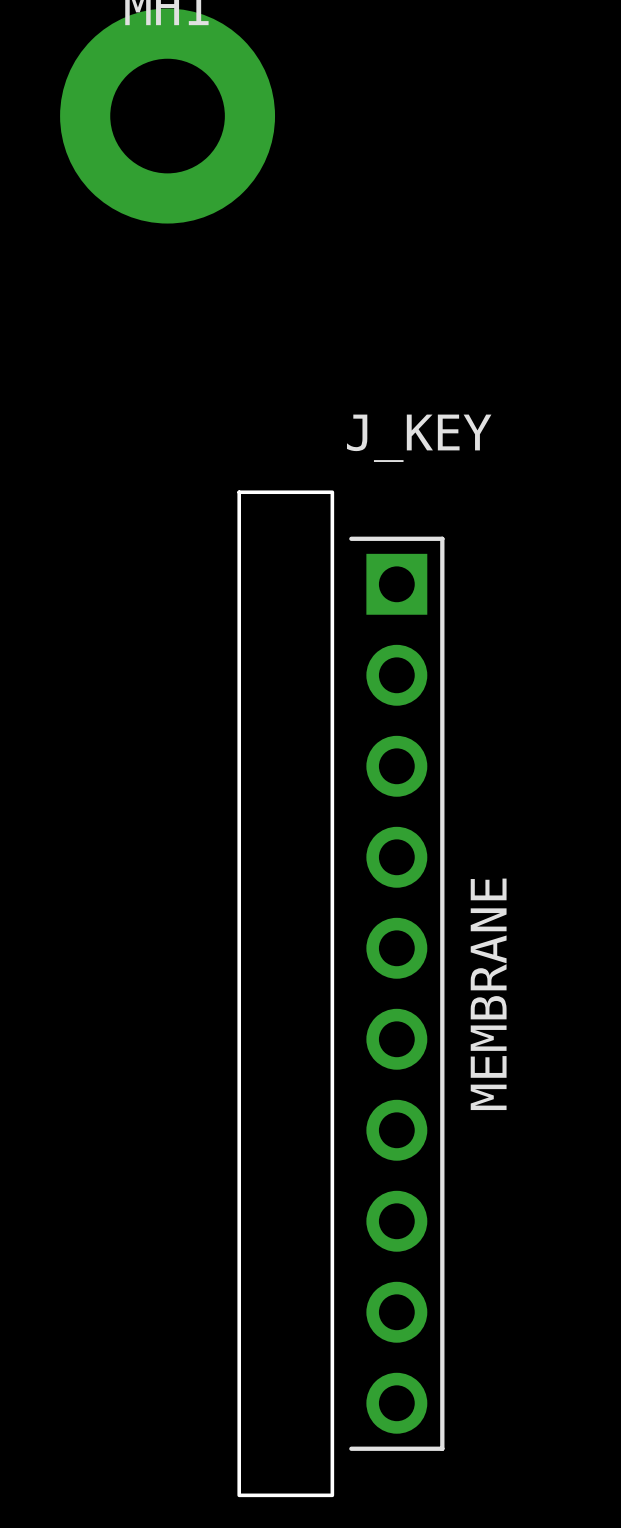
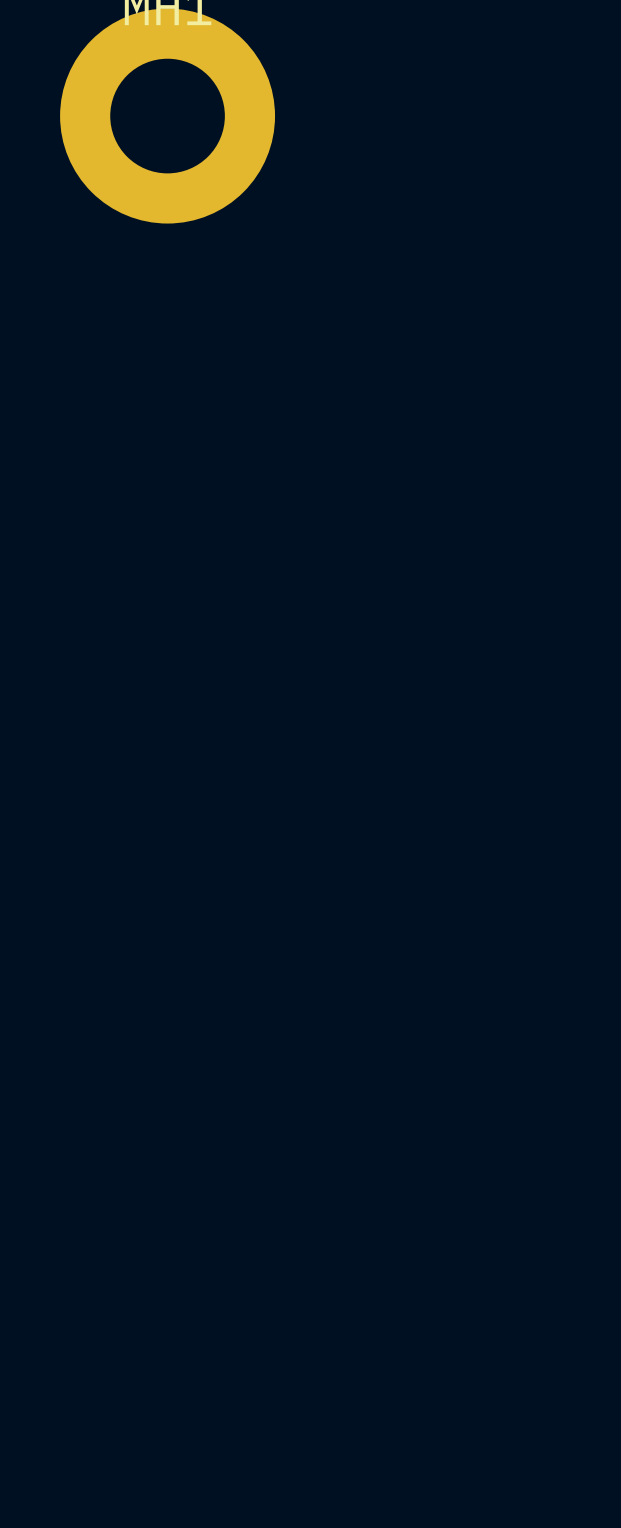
J_KEY: (340, 993) -> none

